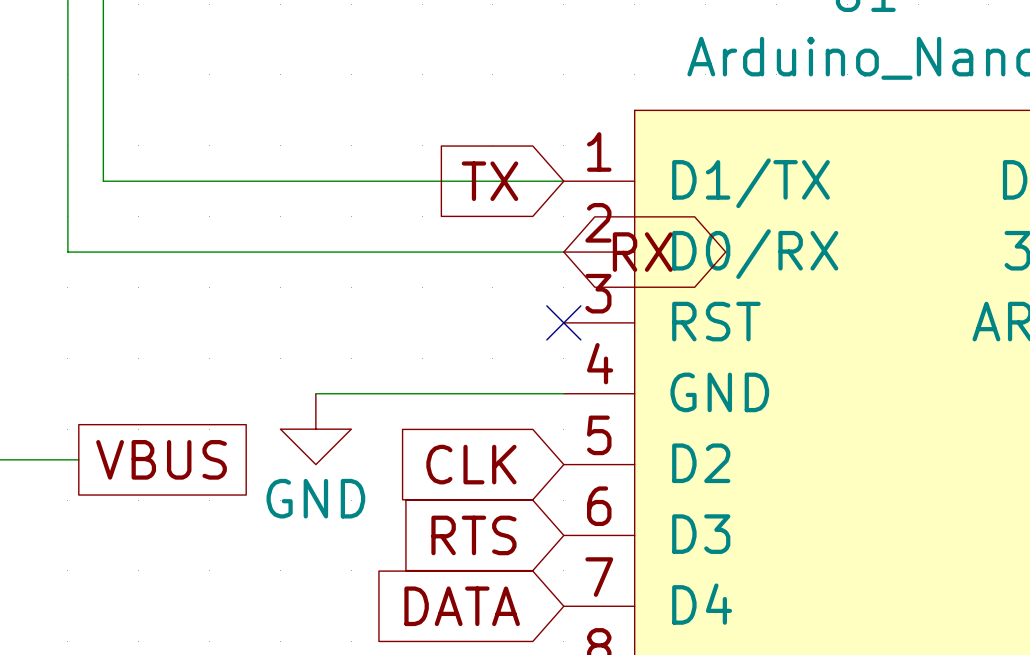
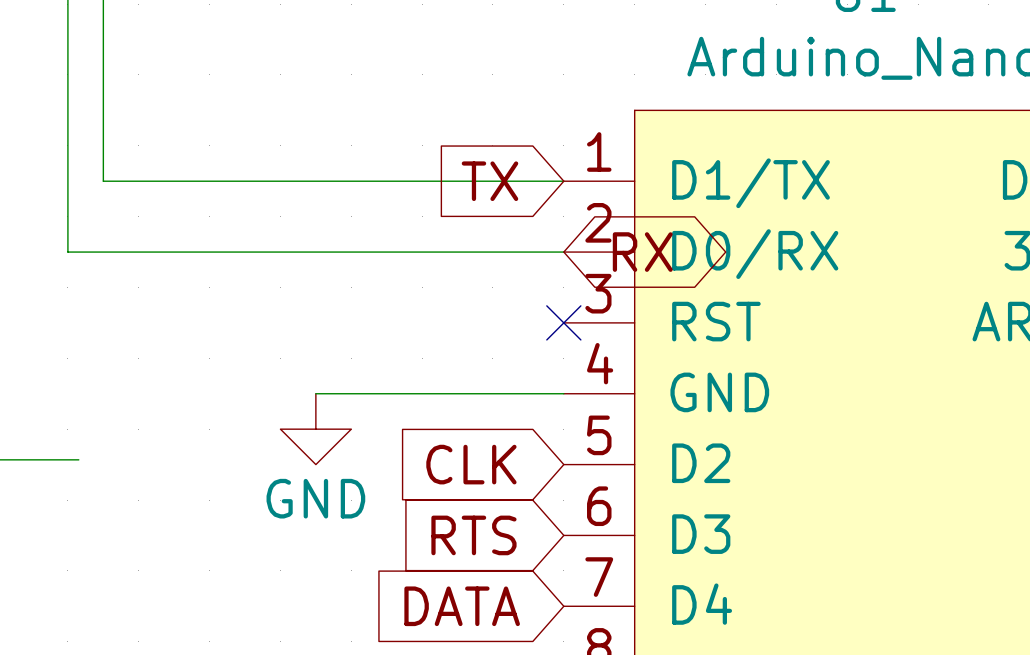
global label: VBUS (161, 459) -> none

